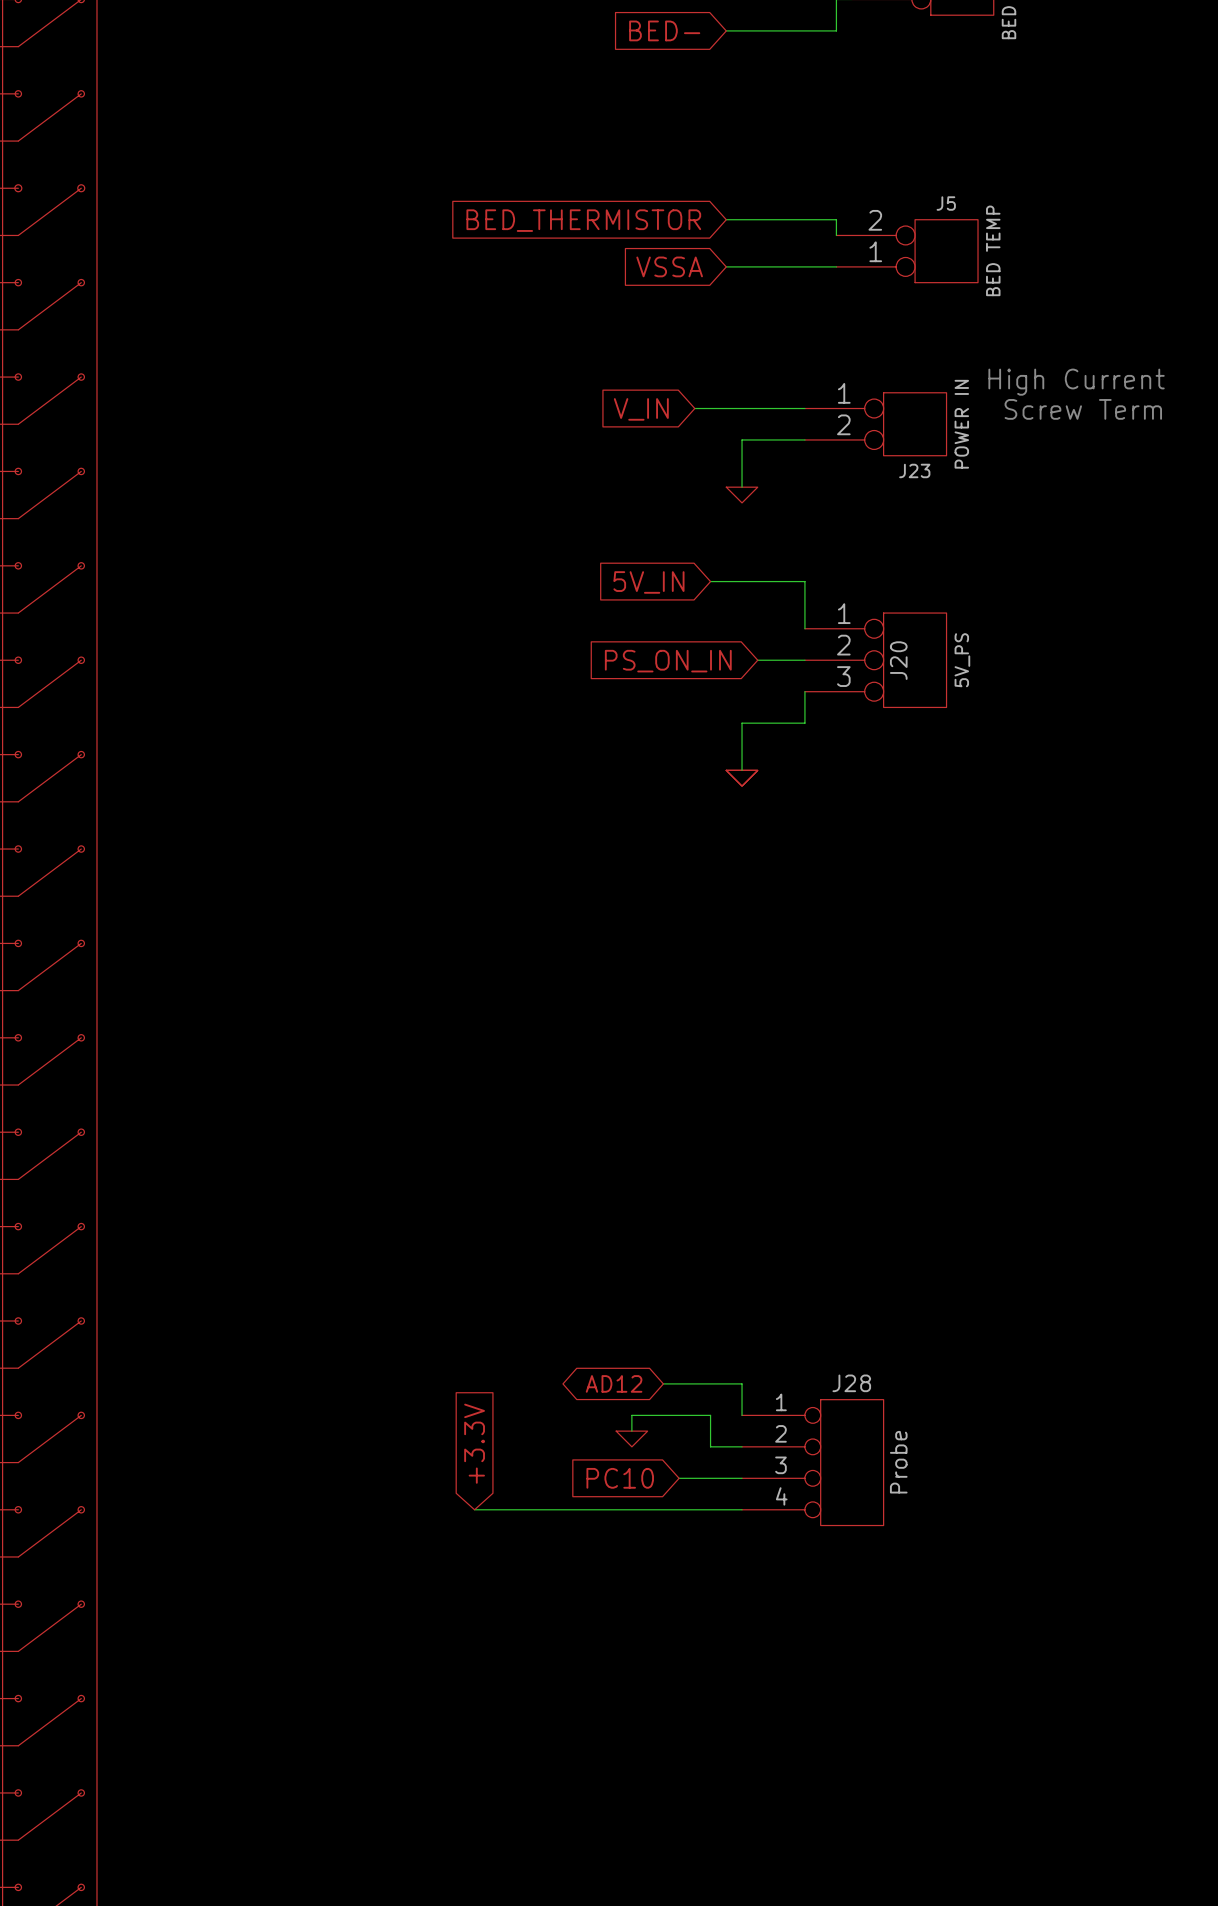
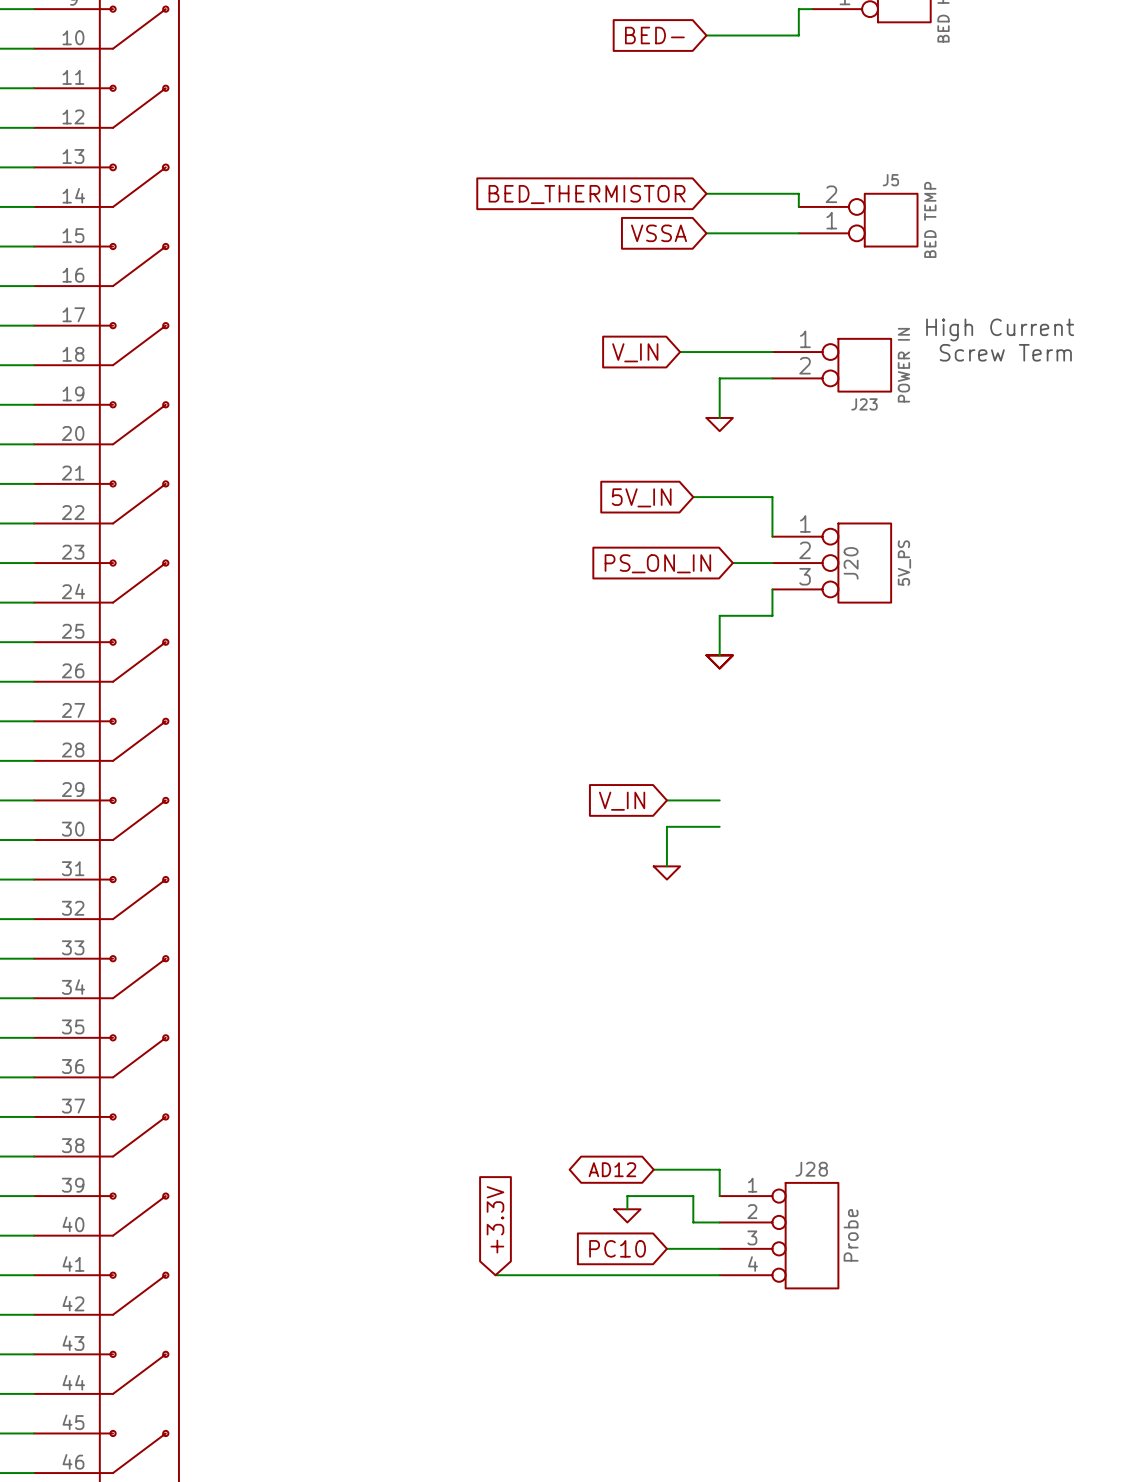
wire: none -> (666, 800) (719, 800)
global label: none -> V_IN (622, 801)
wire: none -> (719, 826) (666, 826) (666, 866)
power symbol: none -> (666, 872)

